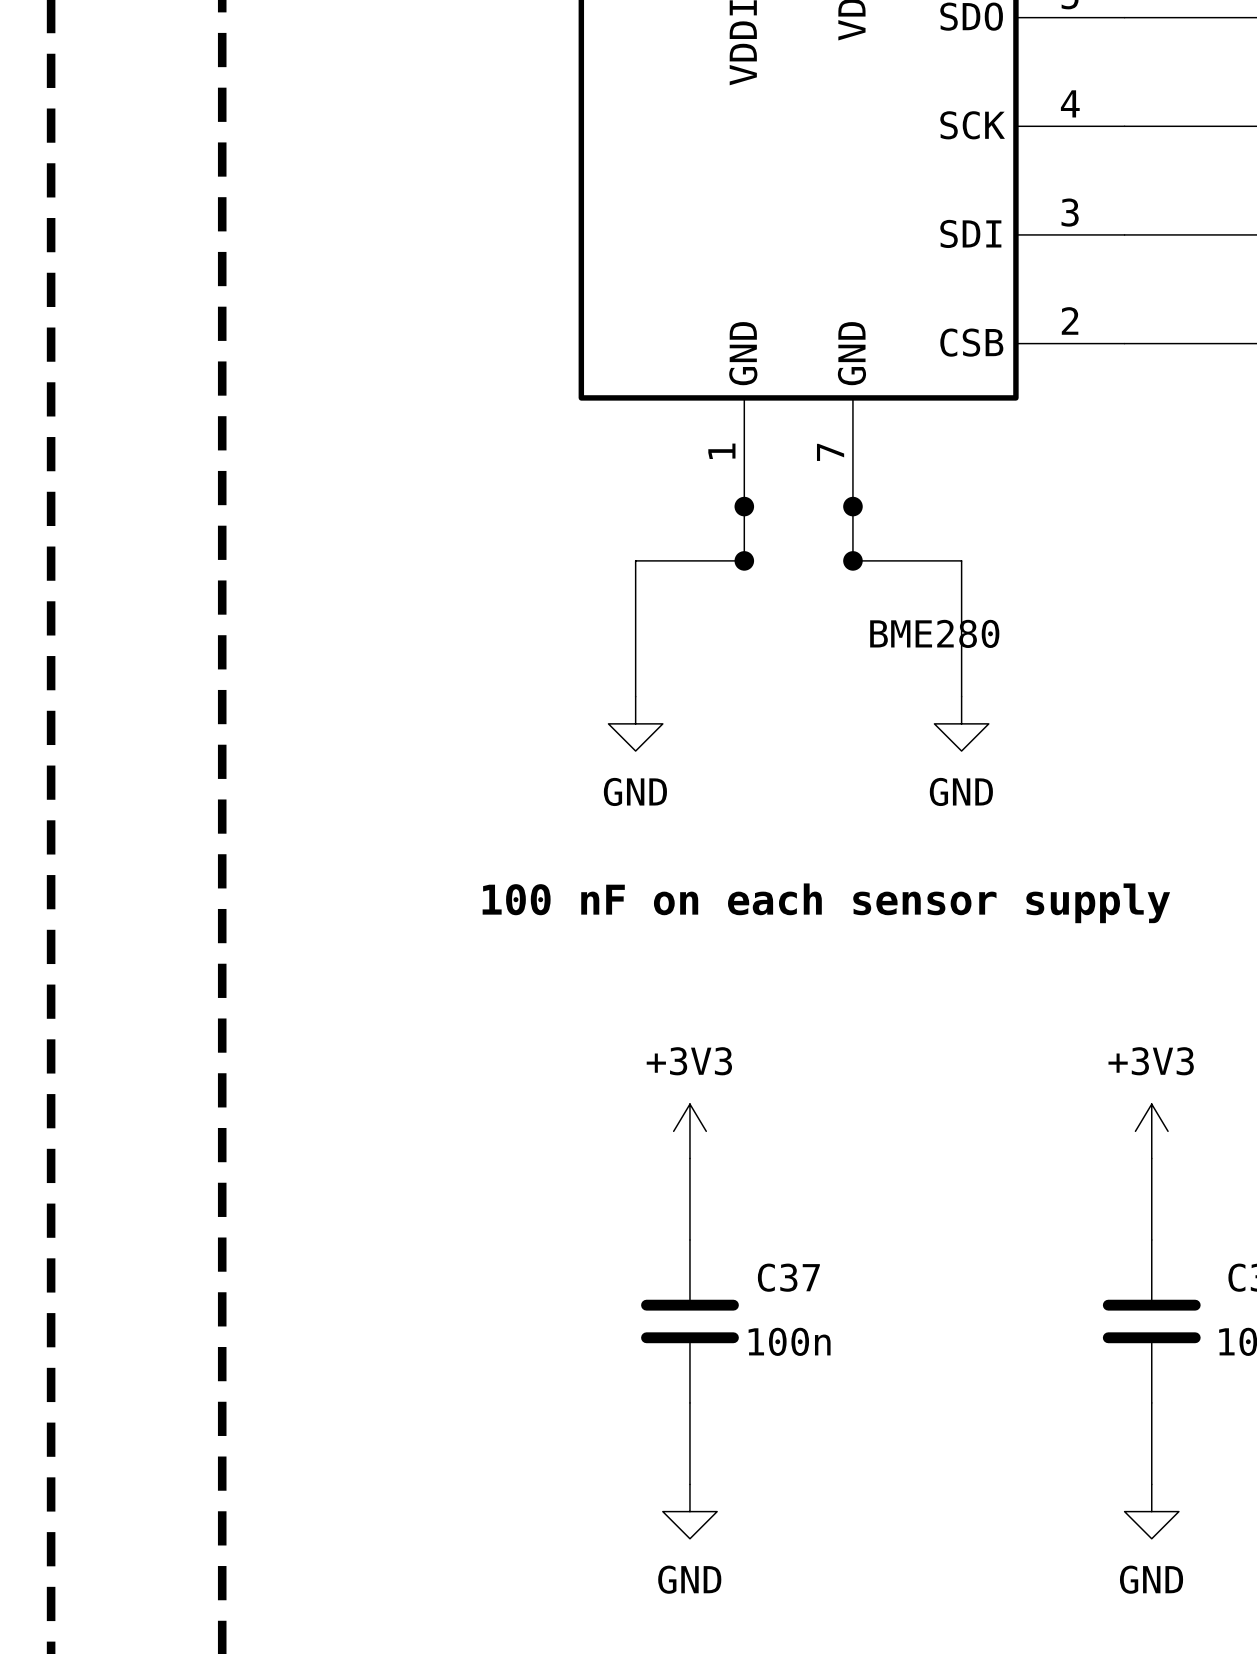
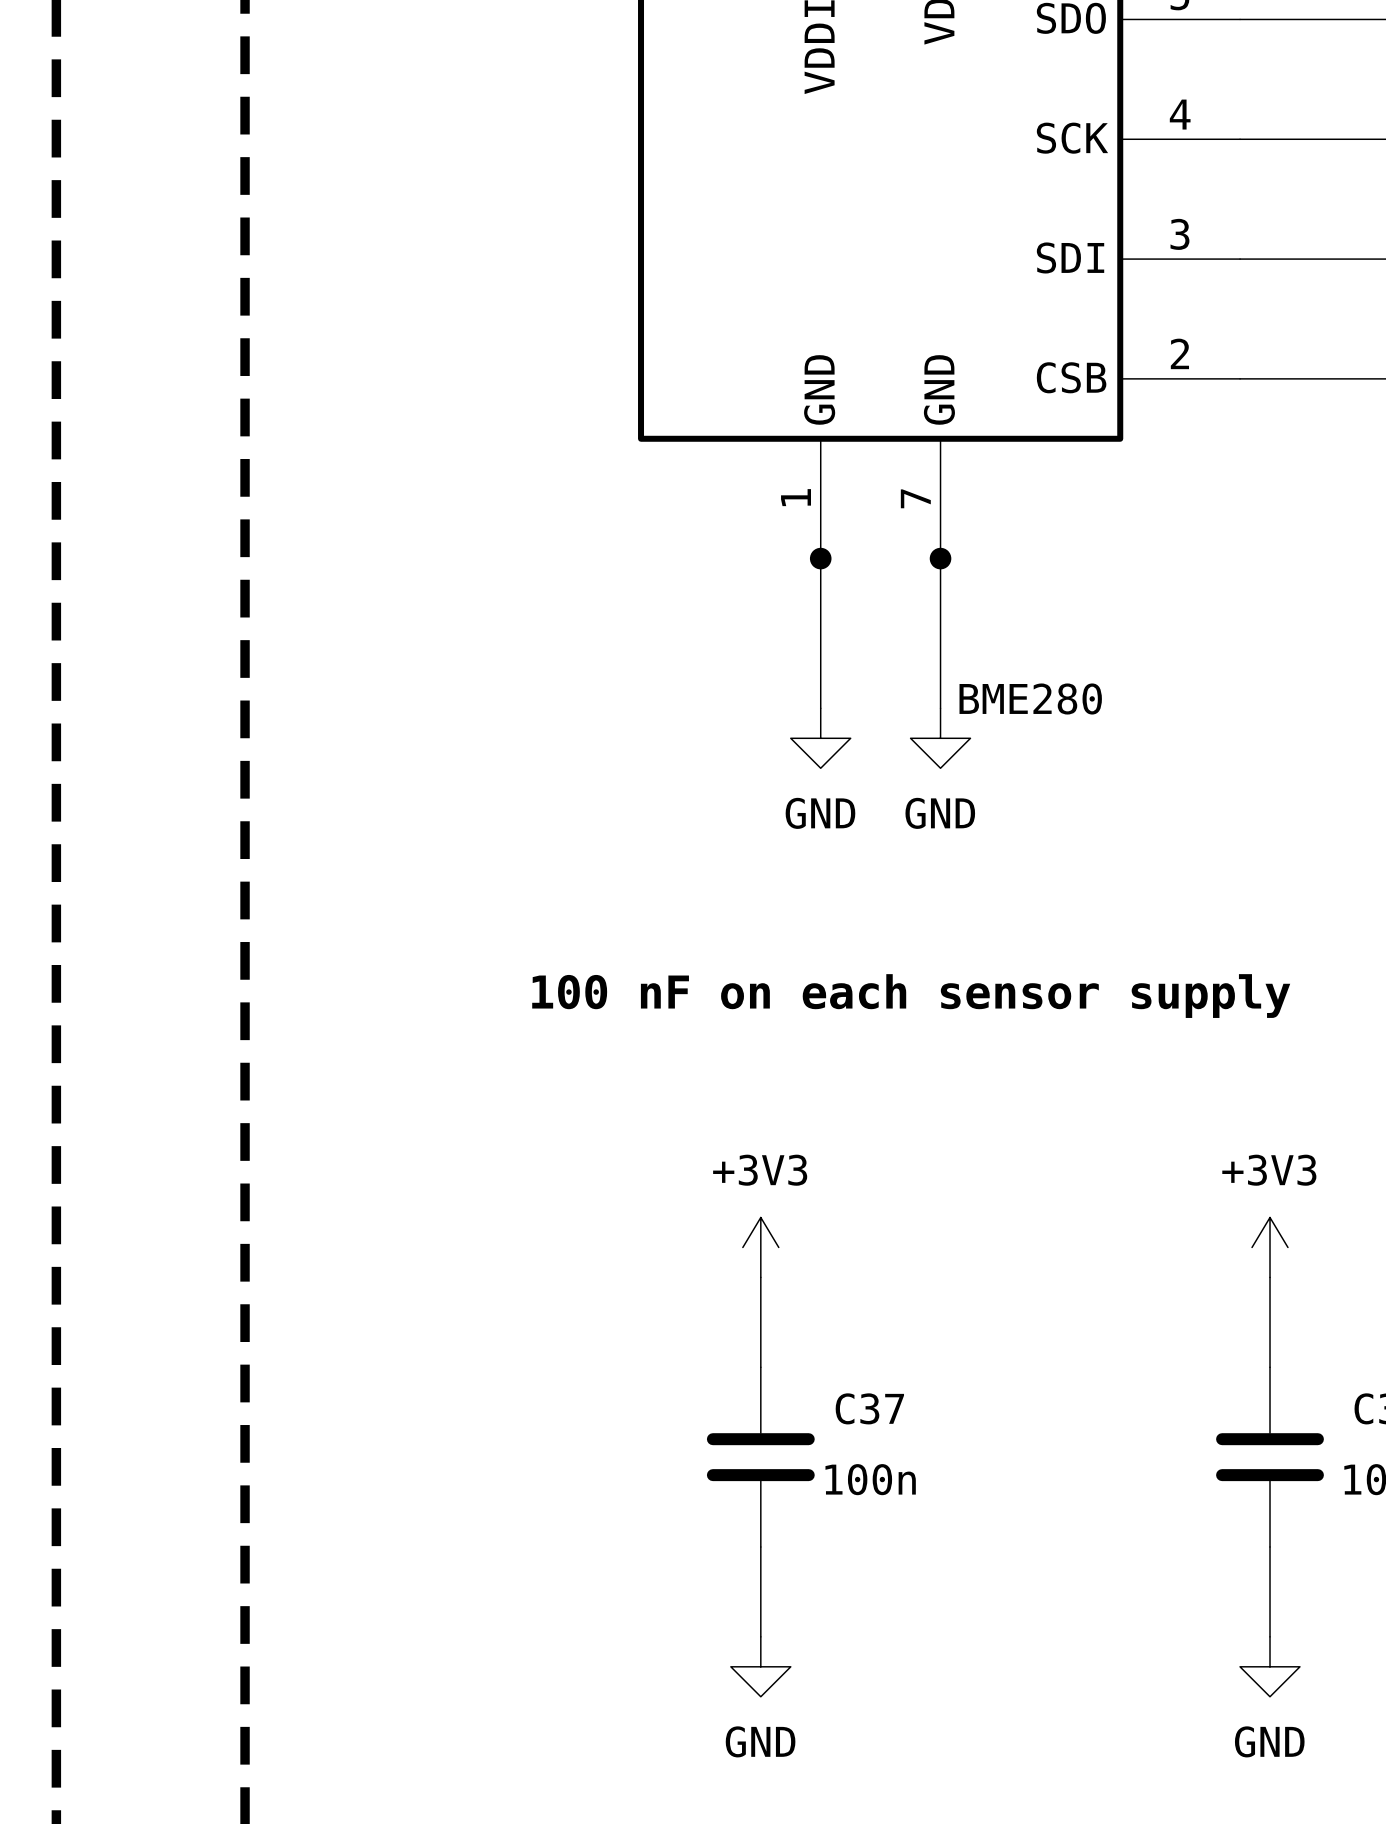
wire: (744, 560) (635, 560) (635, 696) -> (820, 618) (820, 708)
junction: (744, 560) -> none
wire: (852, 560) (961, 560) (961, 696) -> (940, 618) (940, 708)
junction: (852, 560) -> none
power symbol: none -> GND (820, 738)
power symbol: none -> GND (940, 738)
power symbol: GND (635, 723) -> none
power symbol: GND (961, 723) -> none

